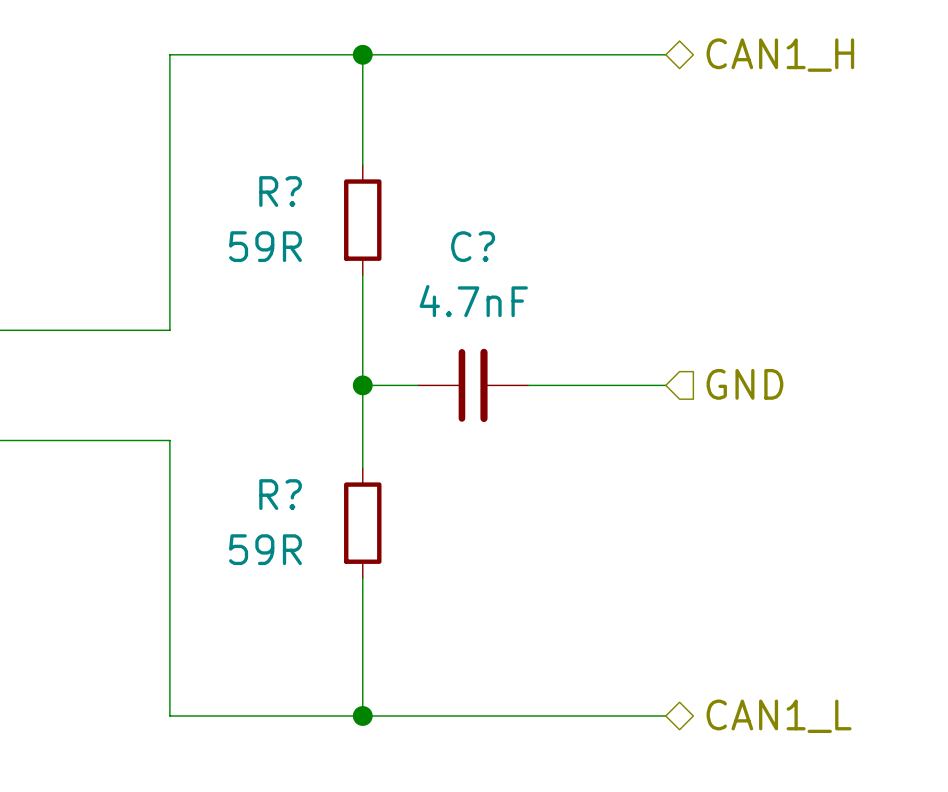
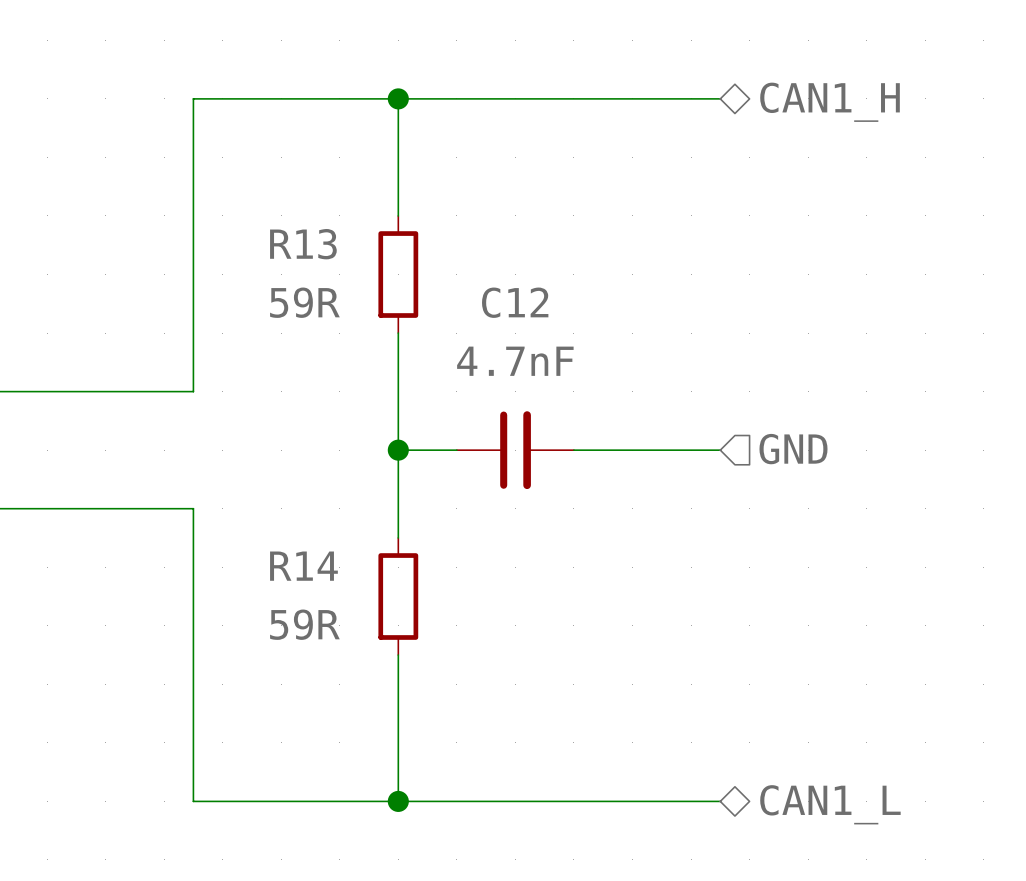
R? name: R? (280, 191) -> R13 (303, 244)
C? name: C? (473, 246) -> C12 (515, 302)
R? name: R? (280, 494) -> R14 (303, 566)

